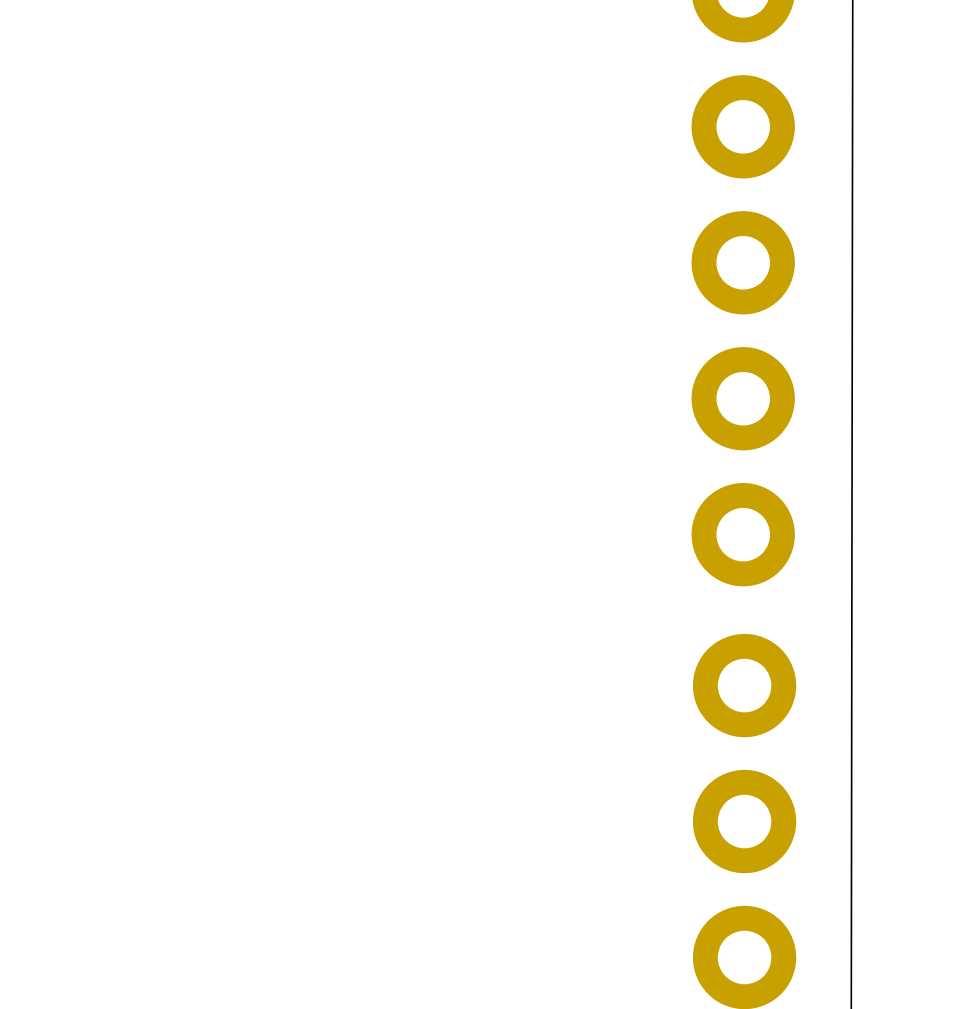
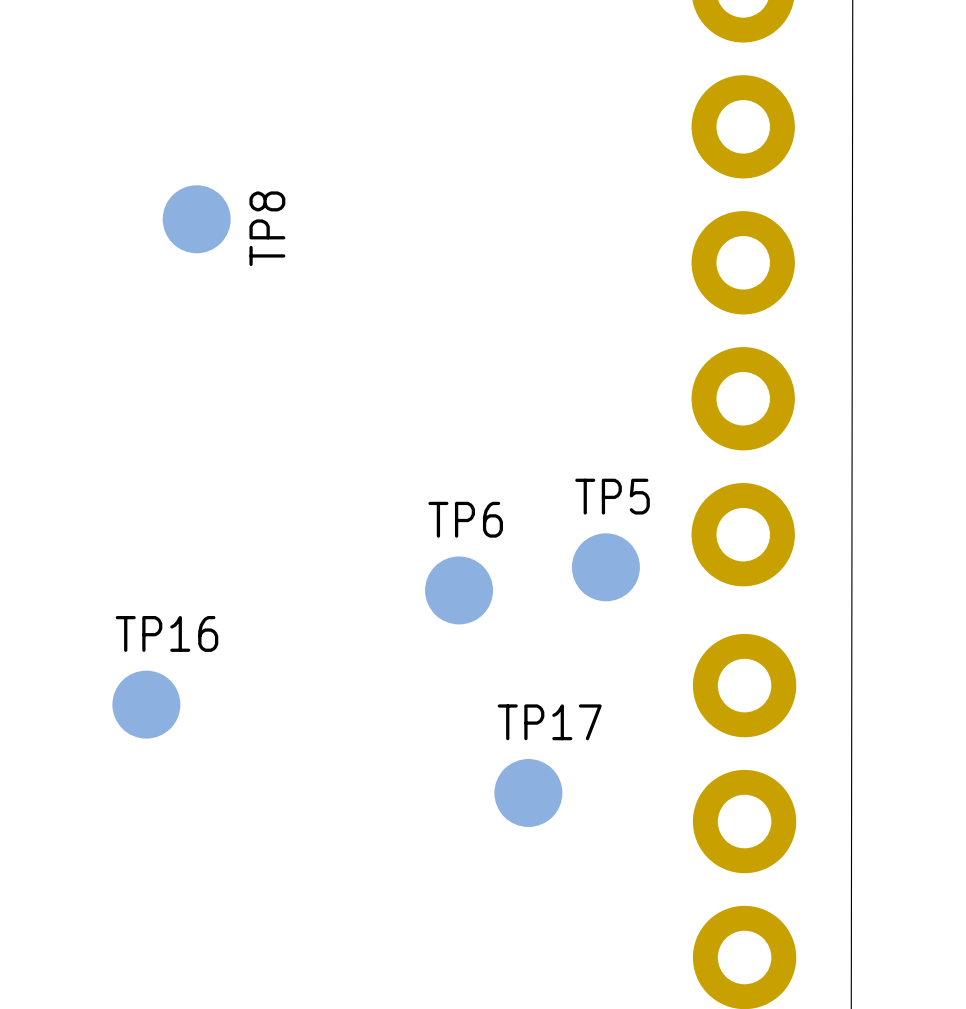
TP8: none -> (196, 219)
TP5: none -> (605, 567)
TP6: none -> (459, 590)
TP16: none -> (146, 704)
TP17: none -> (528, 793)

